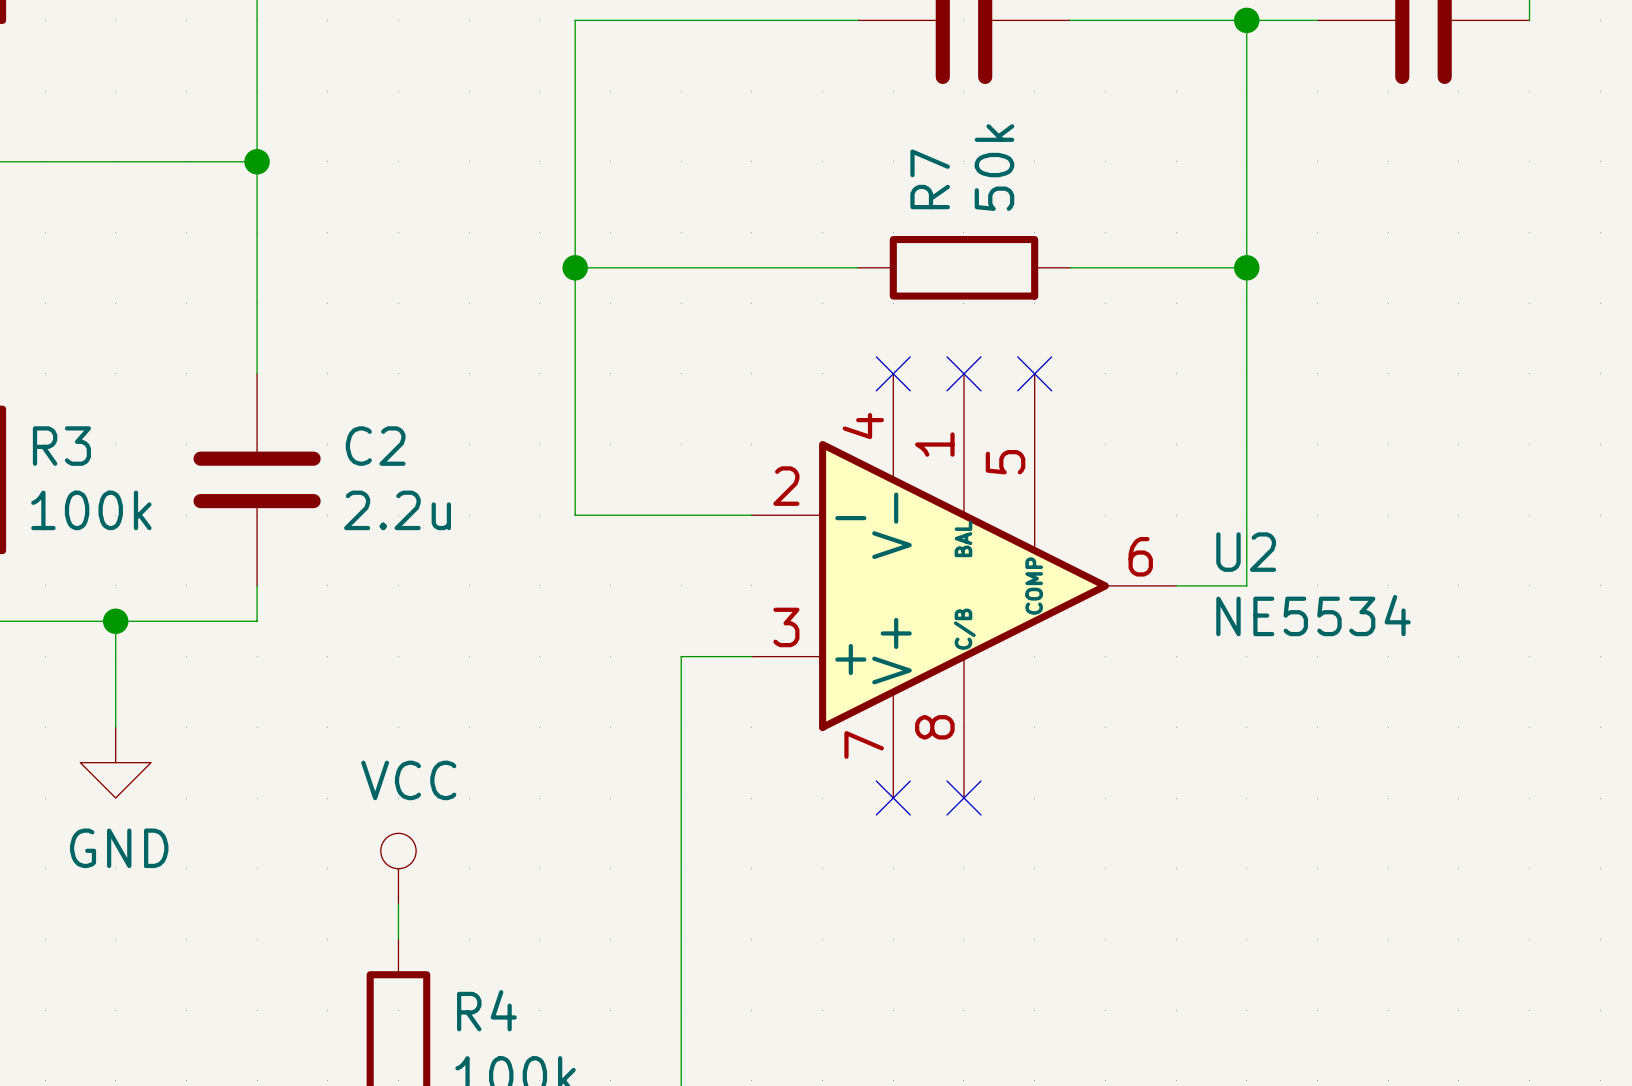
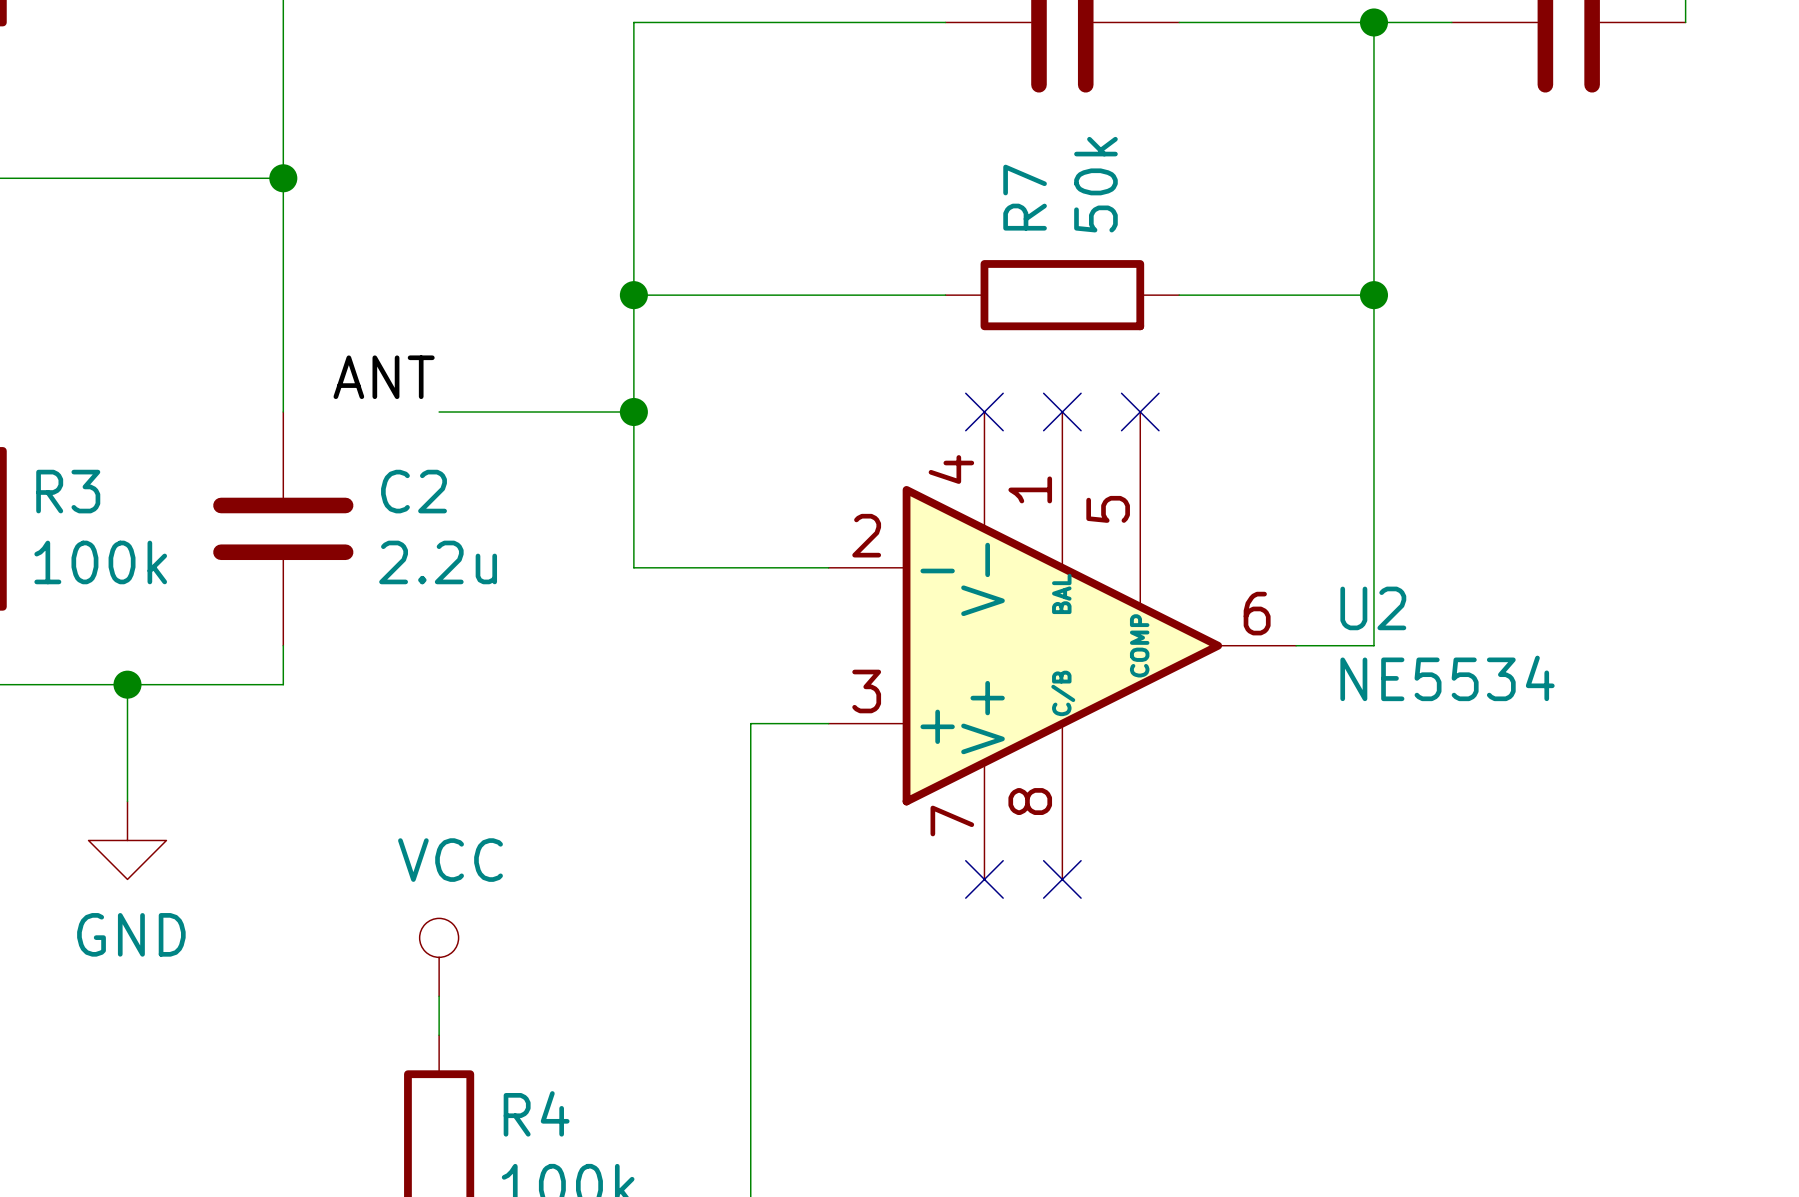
label: none -> ANT (384, 377)
wire: none -> (439, 412) (633, 412)
junction: none -> (633, 412)

